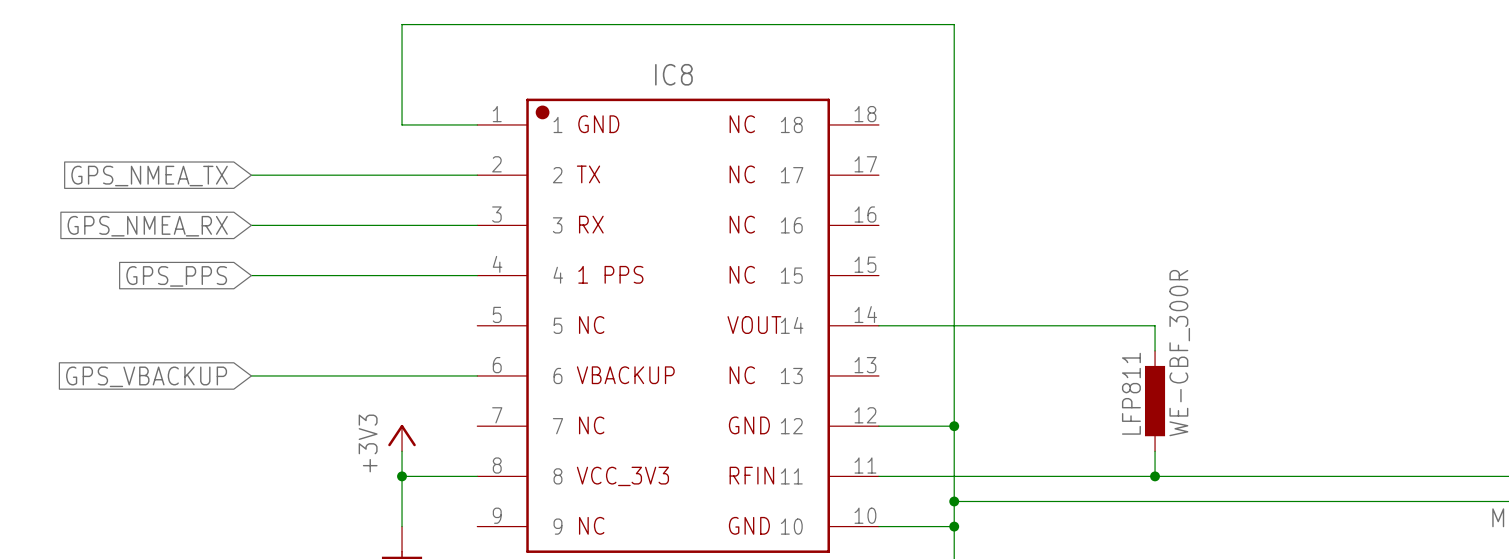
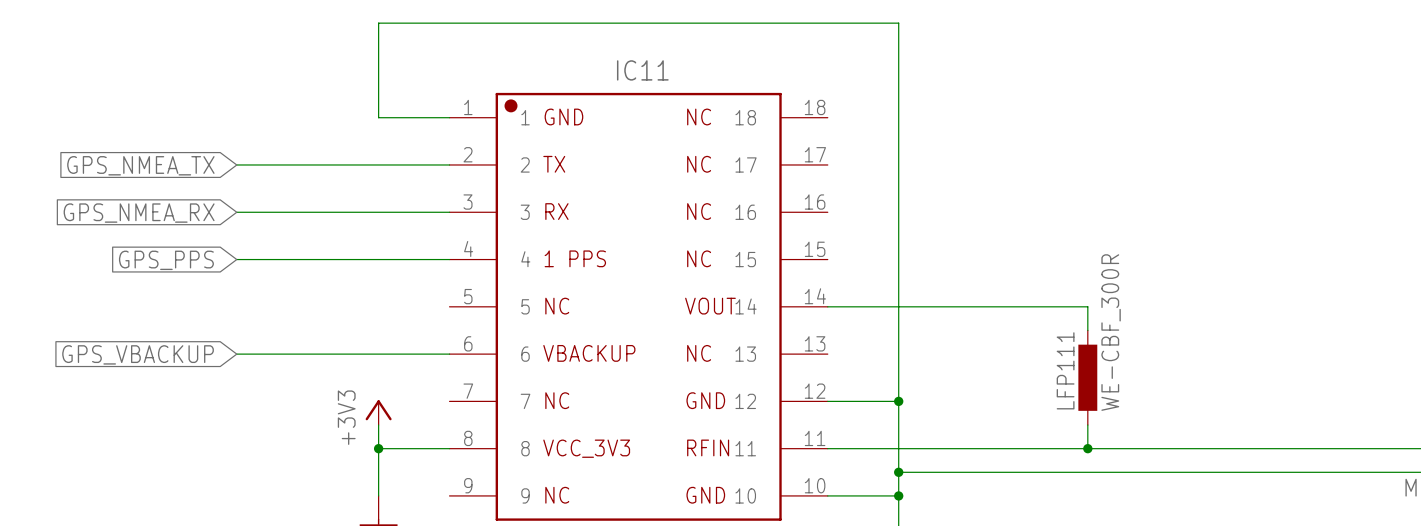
IC8 name: IC8 (673, 74) -> IC11 (642, 70)
LFP811 name: LFP811 (1131, 393) -> LFP111 (1065, 370)

